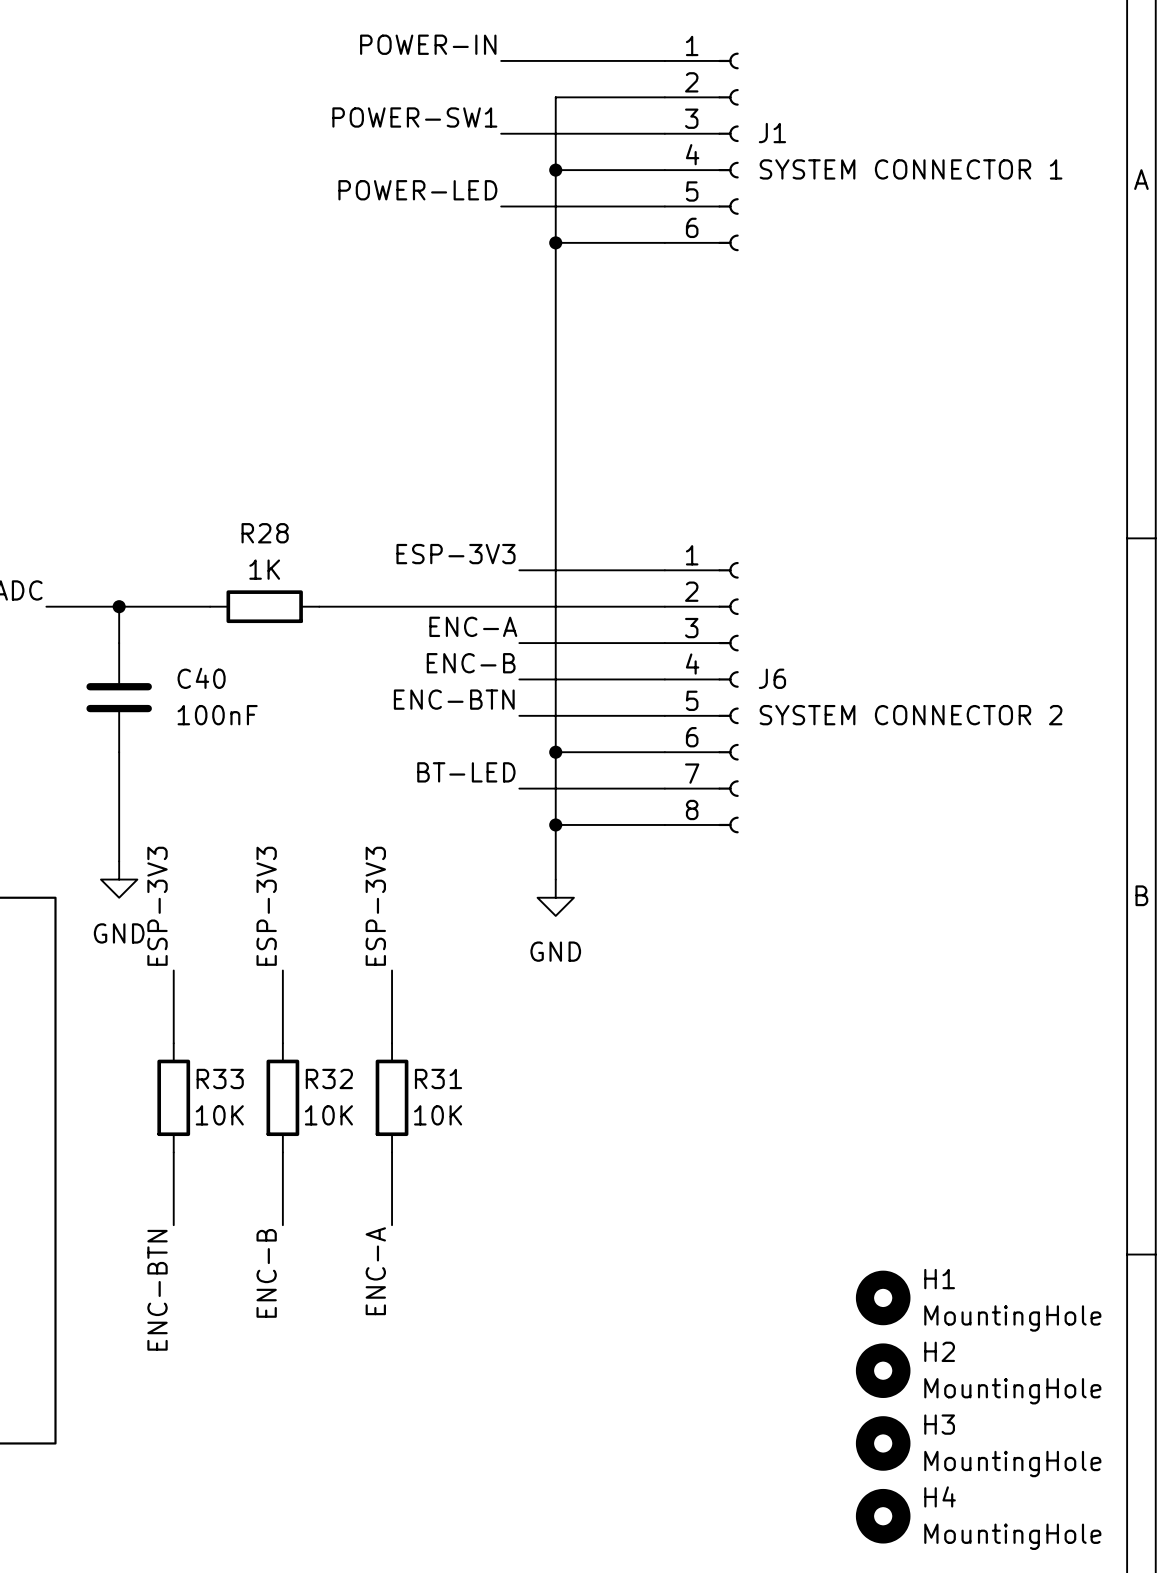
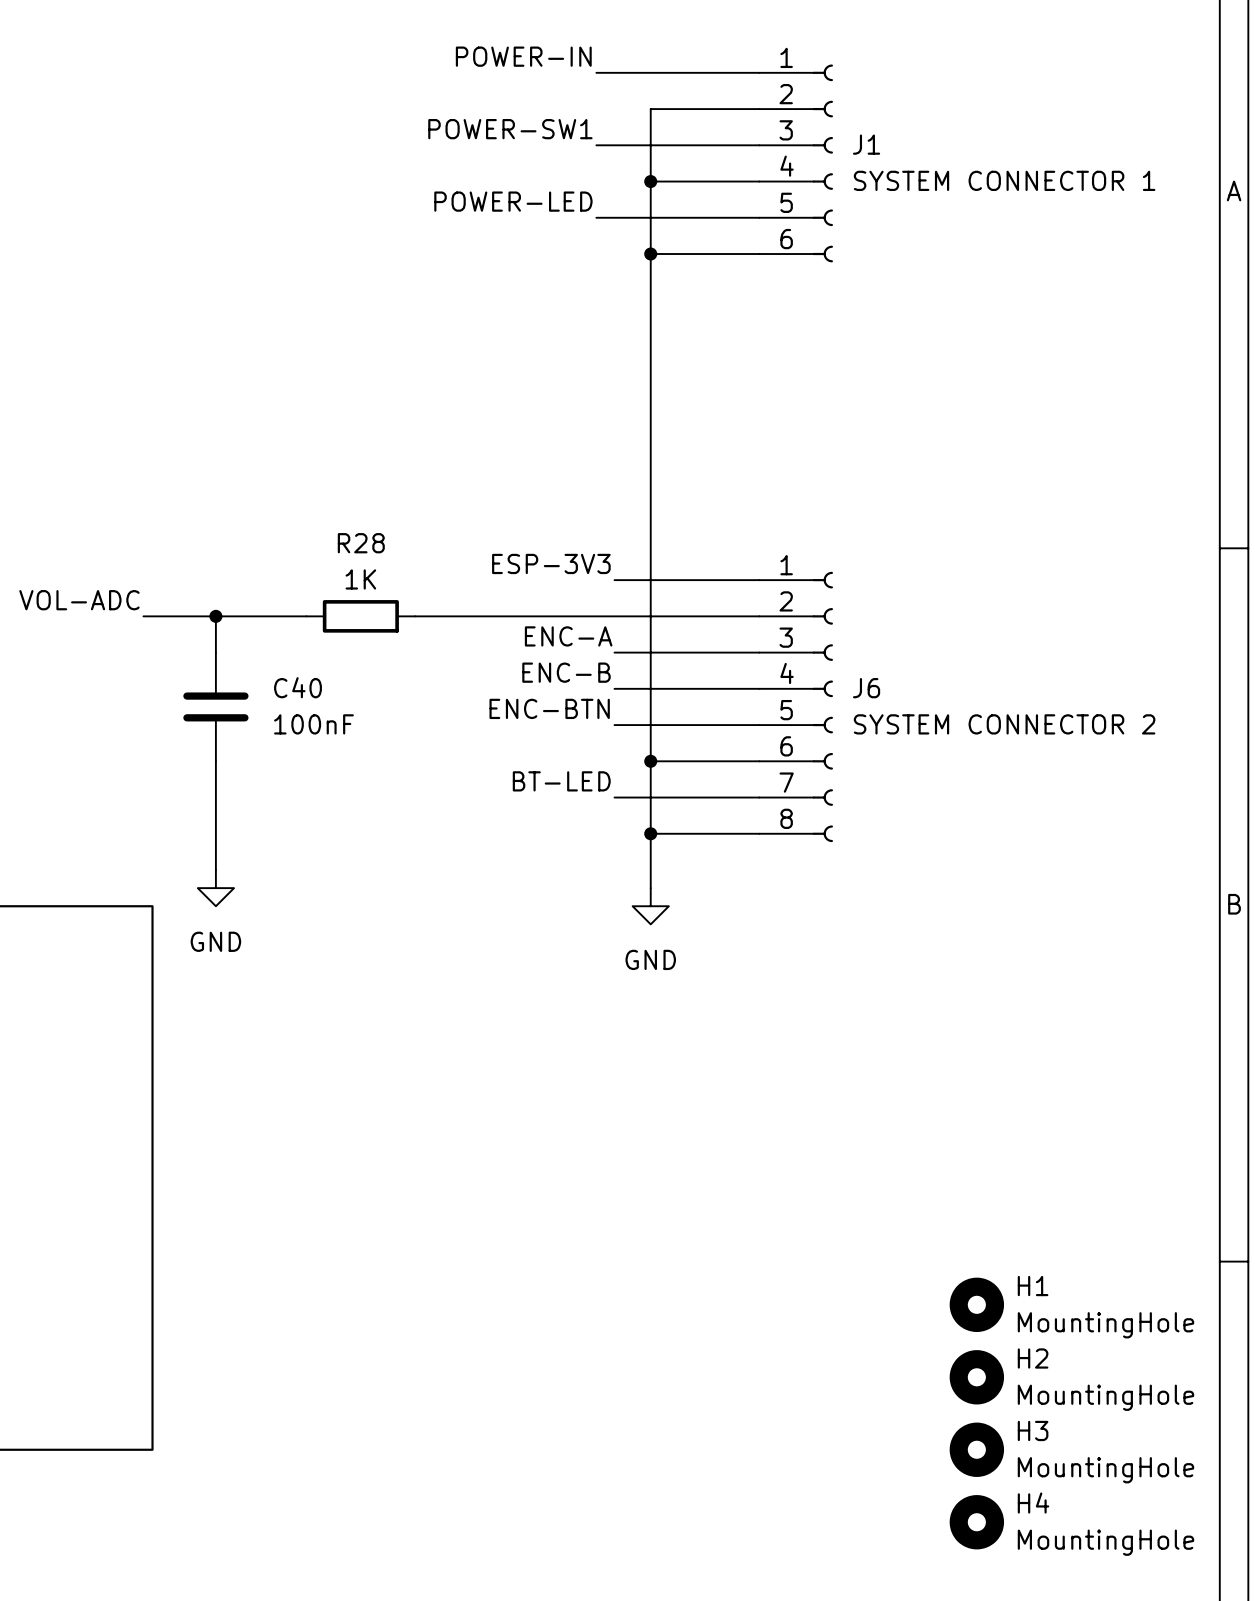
label: ESP-3V3 (157, 906) -> none
label: ESP-3V3 (266, 906) -> none
label: ESP-3V3 (375, 906) -> none
wire: (173, 970) (173, 1043) -> none
wire: (282, 970) (282, 1043) -> none
wire: (392, 970) (392, 1043) -> none
R33: 10K (173, 1097) -> none
R32: 10K (282, 1097) -> none
R31: 10K (392, 1097) -> none
wire: (173, 1152) (173, 1225) -> none
wire: (282, 1152) (282, 1225) -> none
wire: (392, 1152) (392, 1225) -> none
label: ENC-A (375, 1271) -> none
label: ENC-B (266, 1273) -> none
label: ENC-BTN (157, 1290) -> none

